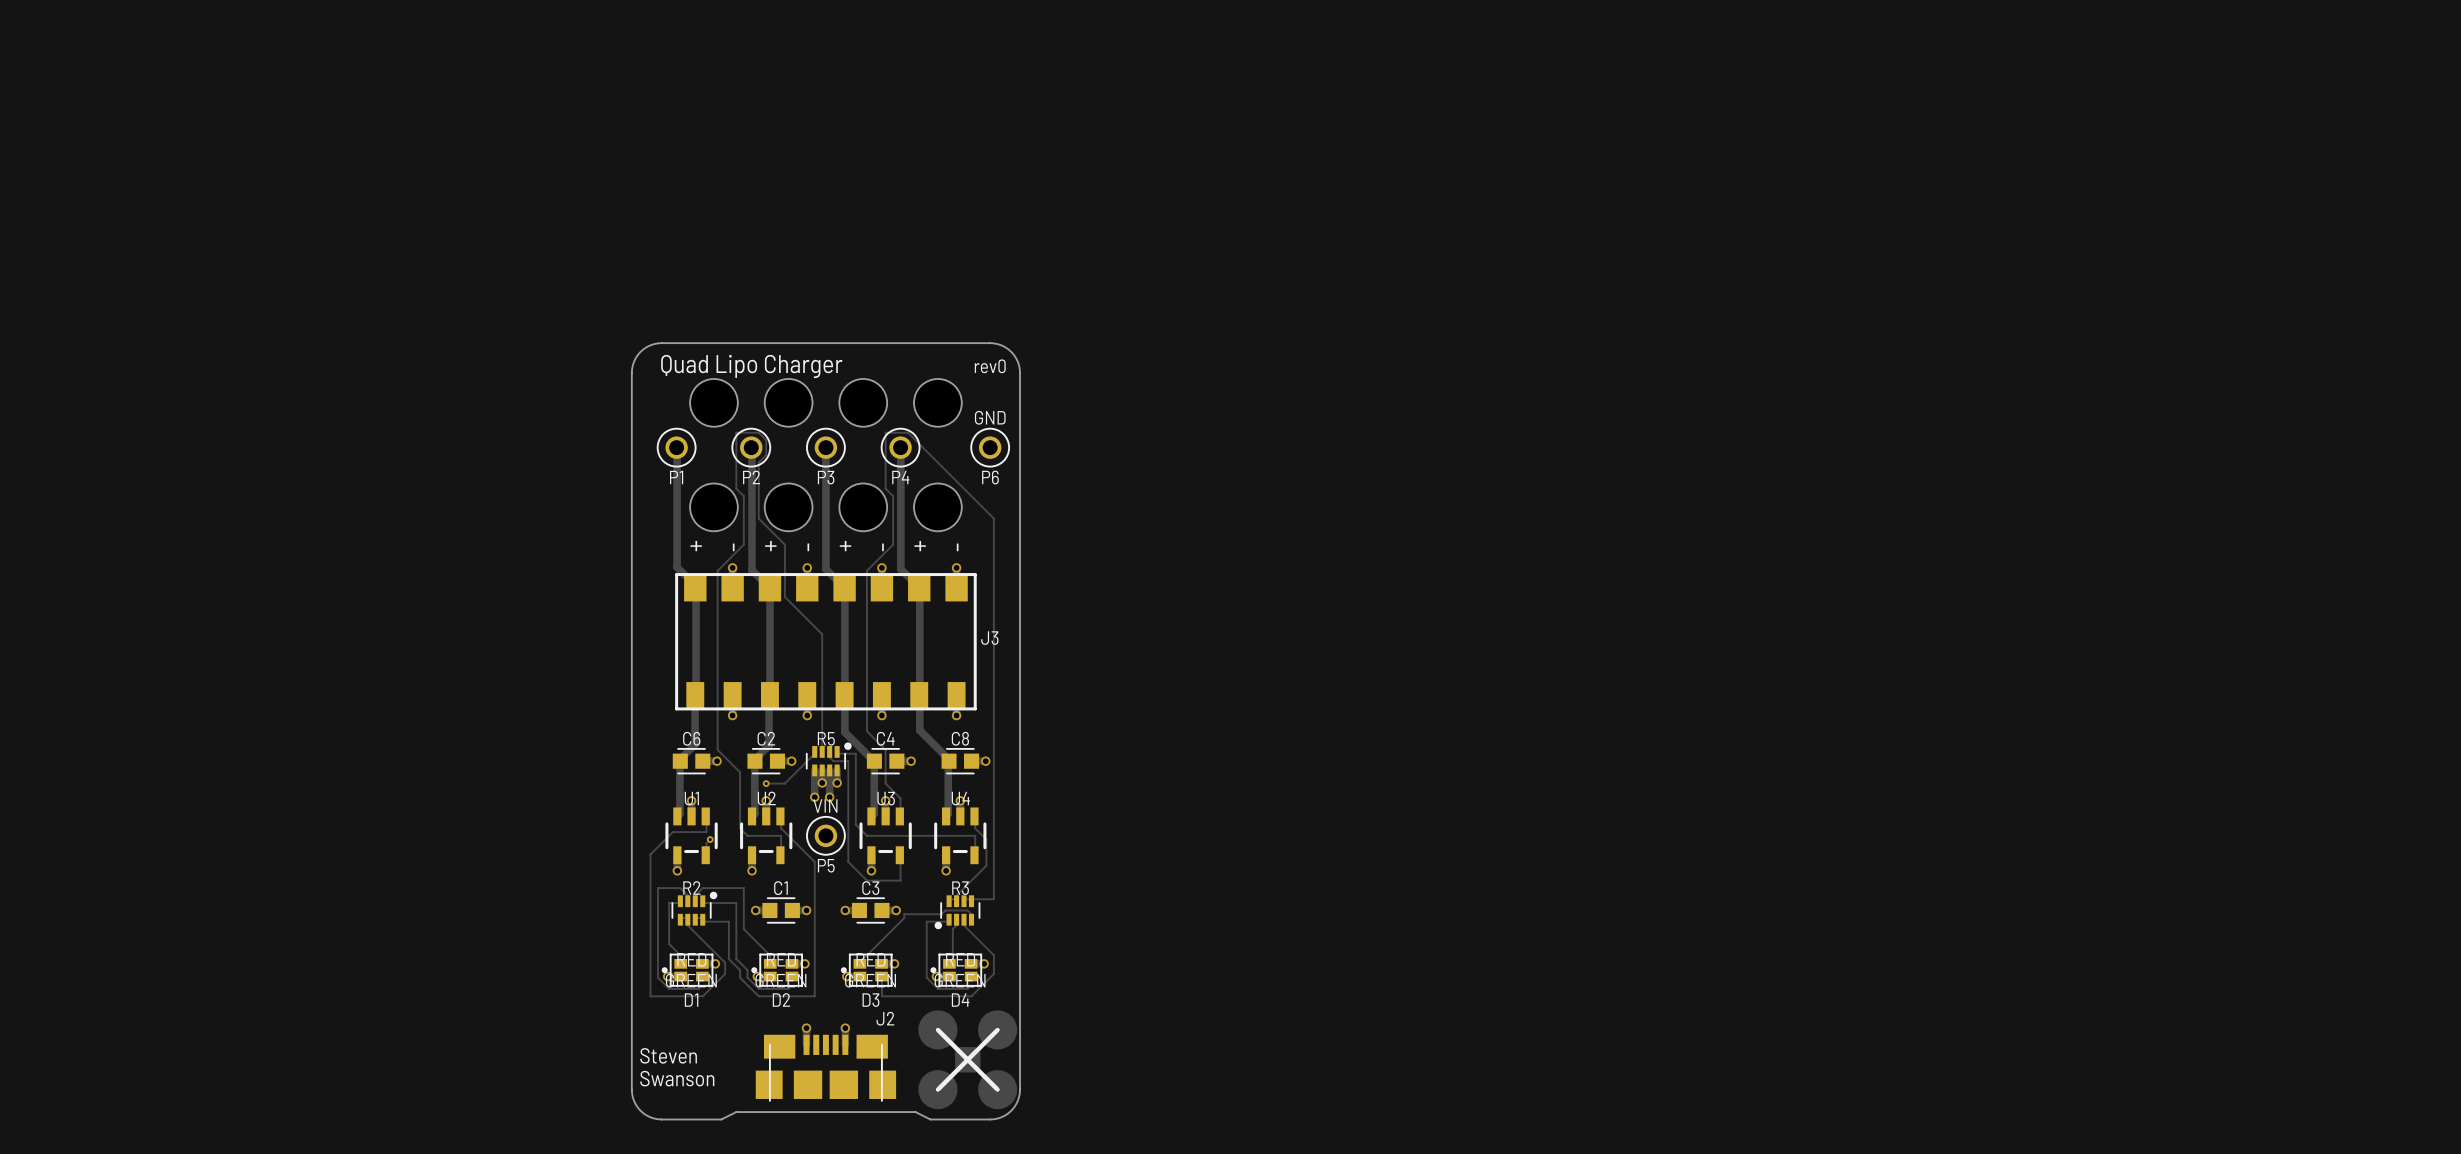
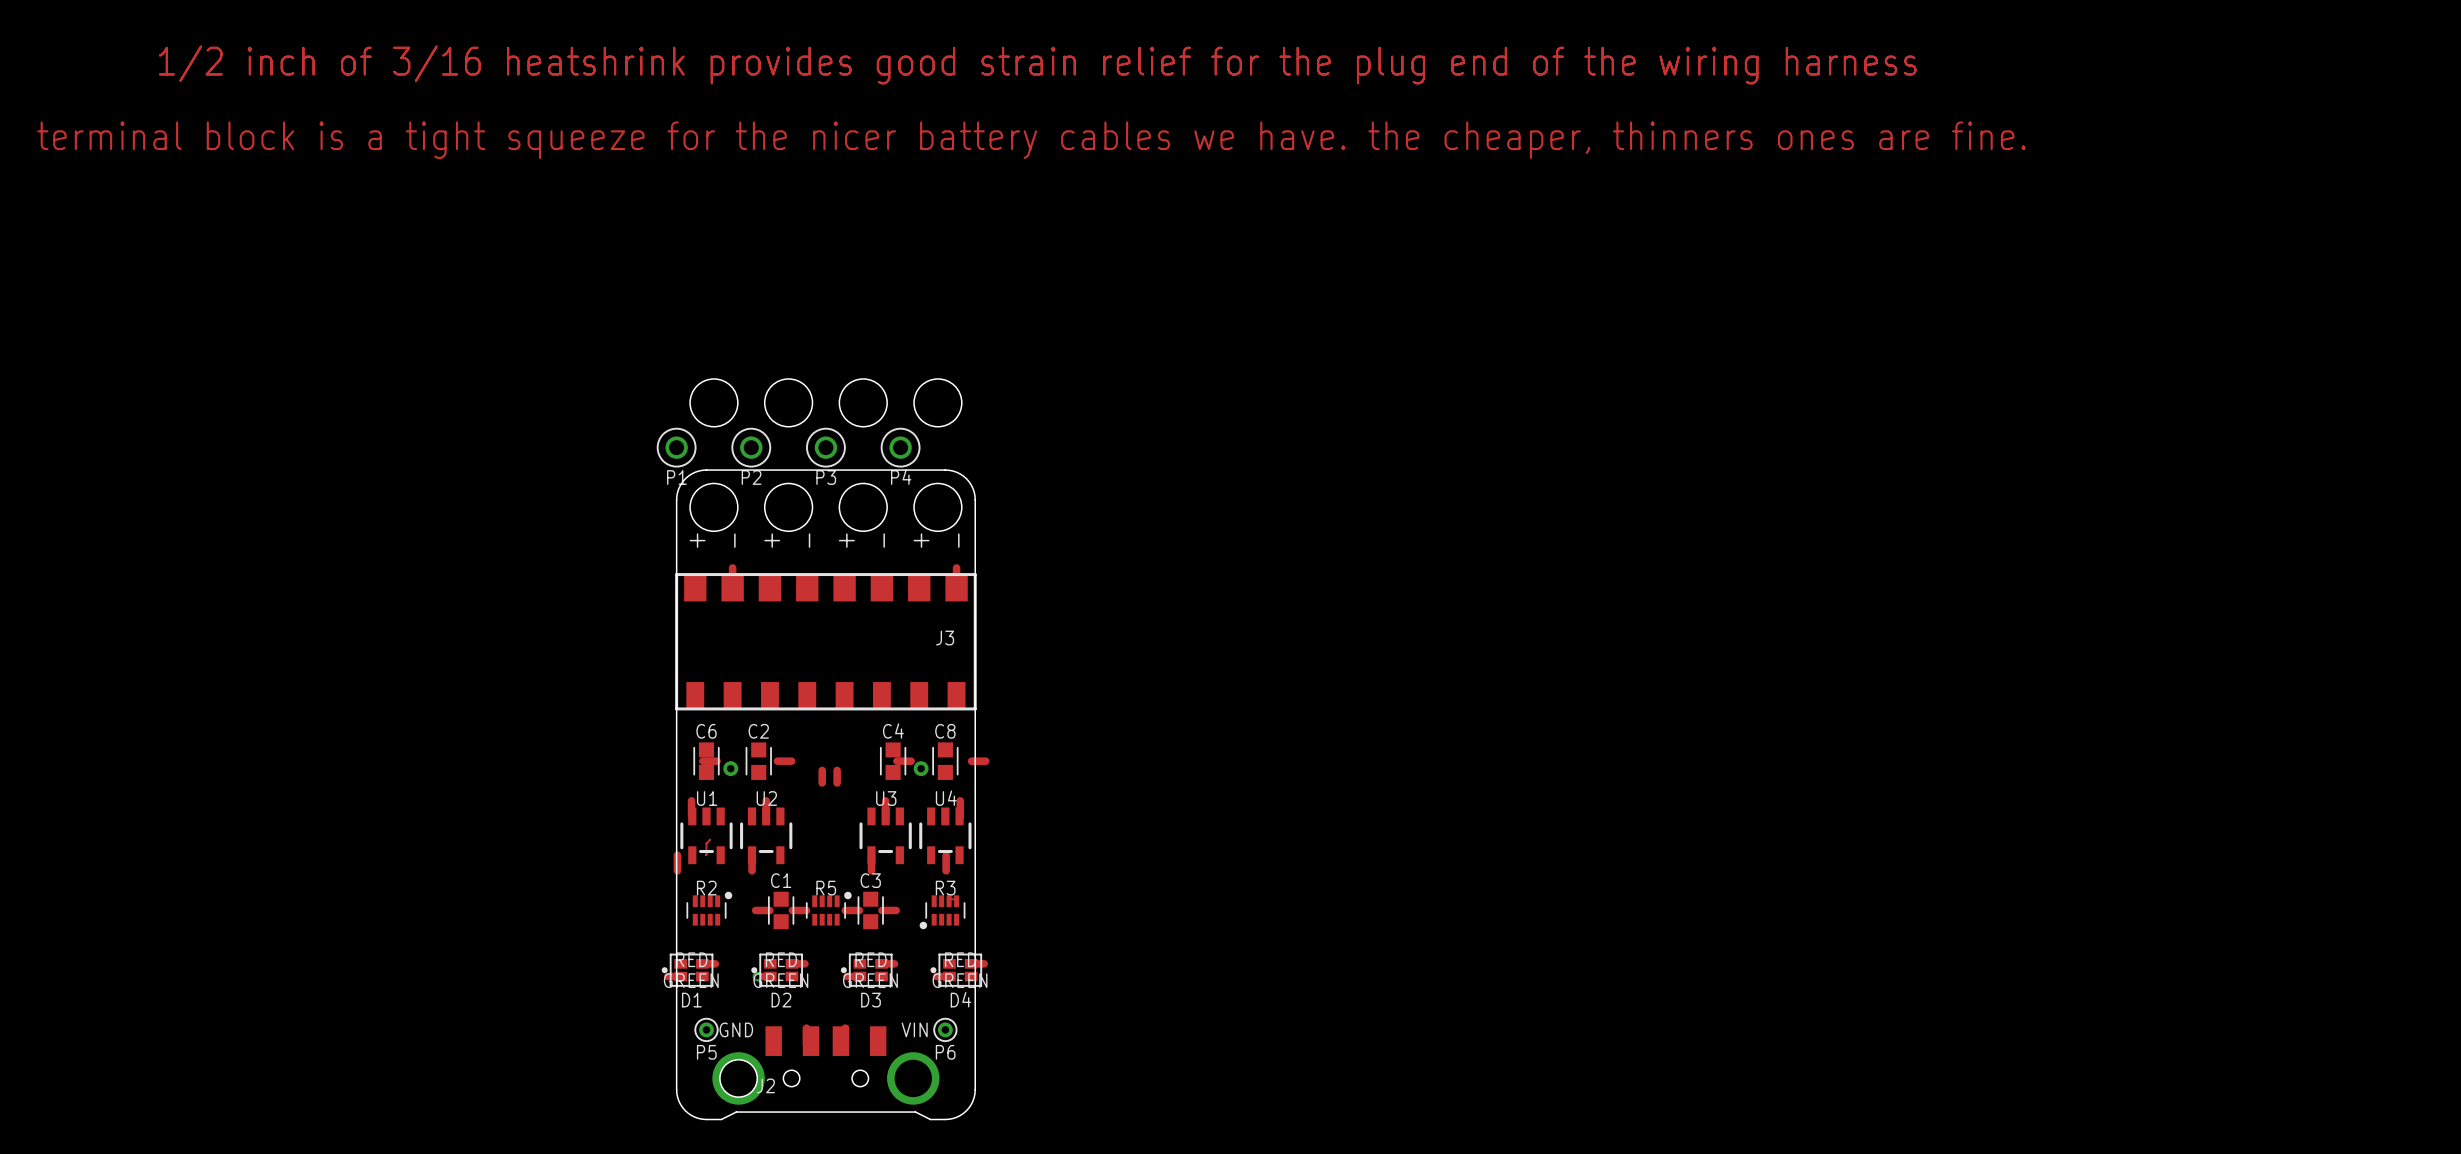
text: none -> 1/2 inch of 3/16 heatshrink provides good strain relief for the plug end of the wiring harness (1037, 64)
text: none -> terminal block is a tight squeeze for the nicer battery cables we have. the cheaper, thinners ones are fine. (1031, 140)
text: Quad Lipo Charger (751, 366) -> none
text: rev0 (990, 366) -> none
text: GND (990, 417) -> none
P6 footprint: [970, 427, 1011, 468] -> [933, 1017, 958, 1043]
track: (676, 447) (677, 567) (696, 588) (695, 744) (679, 761) (679, 813) (677, 816) -> none
track: (751, 447) (751, 570) (769, 587) -> none
track: (825, 447) (825, 569) (844, 588) (844, 732) (874, 761) (874, 813) (871, 816) -> none
track: (900, 447) (900, 569) (919, 588) (919, 730) (949, 761) (948, 813) (946, 816) -> none
via: (732, 567) -> none
via: (807, 567) -> none
via: (881, 567) -> none
via: (956, 567) -> none
track: (770, 588) (769, 745) (754, 761) (754, 813) (752, 816) -> none
J3 name position: J3 (989, 638) -> J3 (945, 638)
via: (732, 715) -> none
via: (807, 715) -> none
via: (881, 715) -> none
via: (956, 715) -> none
track: (814, 751) (784, 783) (766, 783) -> none
track: (822, 751) (822, 634) (784, 596) (784, 544) (758, 518) (758, 462) (766, 455) (766, 440) (758, 432) (736, 432) (736, 488) (743, 496) (743, 544) (717, 570) (717, 749) (740, 772) (740, 828) (747, 835) (781, 835) (780, 855) -> none
track: (829, 751) (829, 757) (833, 761) (848, 761) (848, 861) (866, 880) (900, 880) (899, 855) -> none
track: (837, 751) (837, 753) (855, 753) (855, 824) (866, 835) (975, 835) (974, 855) -> none
R5 position: (828, 759) -> (828, 908)
C6 rotation: 0° (691, 761) -> 90° clockwise (706, 761)
via: (717, 761) -> none
C2 rotation: 0° (766, 761) -> 90° clockwise (758, 761)
via: (791, 761) -> none
C4 rotation: 0° (885, 761) -> 90° clockwise (893, 761)
via: (911, 761) -> none
C8 rotation: 0° (960, 761) -> 90° clockwise (945, 761)
via: (985, 761) -> none
part: none -> (730, 768)
part: none -> (921, 768)
track: (814, 770) (814, 797) -> none
track: (829, 770) (829, 797) -> none
via: (822, 782) -> none
via: (837, 782) -> none
via: (766, 783) -> none
via: (814, 797) -> none
via: (829, 797) -> none
via: (691, 800) -> none
via: (766, 800) -> none
via: (885, 800) -> none
via: (960, 800) -> none
text position: VIN (825, 805) -> VIN (914, 1029)
P5 footprint: [806, 815, 846, 856] -> [694, 1017, 719, 1043]
track: (705, 816) (706, 832) (672, 832) (650, 854) (650, 996) (702, 996) (725, 973) (725, 962) (687, 925) (687, 917) (680, 917) (680, 919) -> none
track: (780, 816) (781, 828) (814, 861) (814, 996) (758, 996) (740, 977) (740, 970) (728, 959) (728, 921) (702, 921) (702, 917) (695, 917) (695, 919) -> none
track: (899, 816) (900, 798) (885, 783) (885, 749) (866, 731) (866, 570) (893, 544) (893, 496) (885, 488) (885, 432) (908, 432) (993, 518) (993, 899) (964, 899) (964, 901) -> none
track: (974, 816) (975, 828) (986, 839) (986, 865) (956, 895) (956, 901) -> none
U1 position: (691, 835) -> (706, 835)
U4 position: (960, 835) -> (945, 835)
via: (710, 839) -> none
via: (677, 870) -> none
via: (752, 870) -> none
via: (871, 870) -> none
via: (946, 870) -> none
track: (680, 901) (680, 903) (669, 903) (669, 944) (680, 955) (680, 963) -> none
track: (687, 901) (687, 895) (680, 888) (657, 888) (657, 977) (669, 988) (699, 988) (699, 977) (702, 976) -> none
track: (695, 901) (695, 895) (702, 888) (743, 888) (743, 929) (769, 955) (770, 963) -> none
track: (702, 901) (702, 903) (736, 903) (736, 959) (747, 970) (747, 977) (758, 988) (788, 988) (788, 977) (791, 976) -> none
R2 position: (694, 908) -> (709, 908)
via: (755, 910) -> none
C1 rotation: 0° (781, 910) -> 90° clockwise (781, 910)
via: (806, 910) -> none
via: (845, 910) -> none
C3 rotation: 0° (870, 910) -> 90° clockwise (870, 910)
via: (896, 910) -> none
R3 position: (957, 912) -> (942, 912)
track: (949, 919) (949, 921) (926, 921) (926, 977) (937, 988) (967, 988) (967, 977) (971, 976) -> none
track: (956, 919) (956, 925) (952, 929) (952, 962) (949, 963) -> none
track: (964, 919) (964, 925) (993, 955) (993, 973) (971, 996) (881, 996) (881, 976) -> none
track: (971, 919) (971, 914) (967, 910) (945, 910) (941, 914) (904, 914) (904, 917) (863, 959) (863, 962) (859, 963) -> none
via: (715, 963) -> none
via: (804, 963) -> none
via: (894, 963) -> none
via: (984, 963) -> none
via: (667, 976) -> none
via: (846, 976) -> none
via: (936, 976) -> none
drawing: [918, 1010, 1018, 1110] -> none
J2 name position: J2 (885, 1018) -> J2 (765, 1085)
via: (806, 1028) -> none
via: (845, 1028) -> none
text: none -> GND (736, 1029)
J2 footprint: [755, 1034, 897, 1102] -> [712, 1026, 940, 1105]
text: Steven (668, 1055) -> none
text: Swanson (677, 1078) -> none
board edge: (706, 1119) (661, 1119) (650, 1117) (640, 1110) (635, 1104) (631, 1089) (631, 372) (634, 361) (640, 351) (650, 345) (661, 343) (990, 343) (1005, 347) (1011, 351) (1017, 361) (1020, 372) (1019, 1093) (1013, 1107) (1001, 1117) (990, 1119) (945, 1119) -> (706, 1119) (695, 1117) (685, 1110) (678, 1101) (676, 1089) (676, 499) (678, 488) (685, 478) (695, 472) (706, 470) (949, 470) (963, 476) (972, 488) (975, 499) (975, 1089) (972, 1101) (966, 1110) (956, 1117) (945, 1119)

